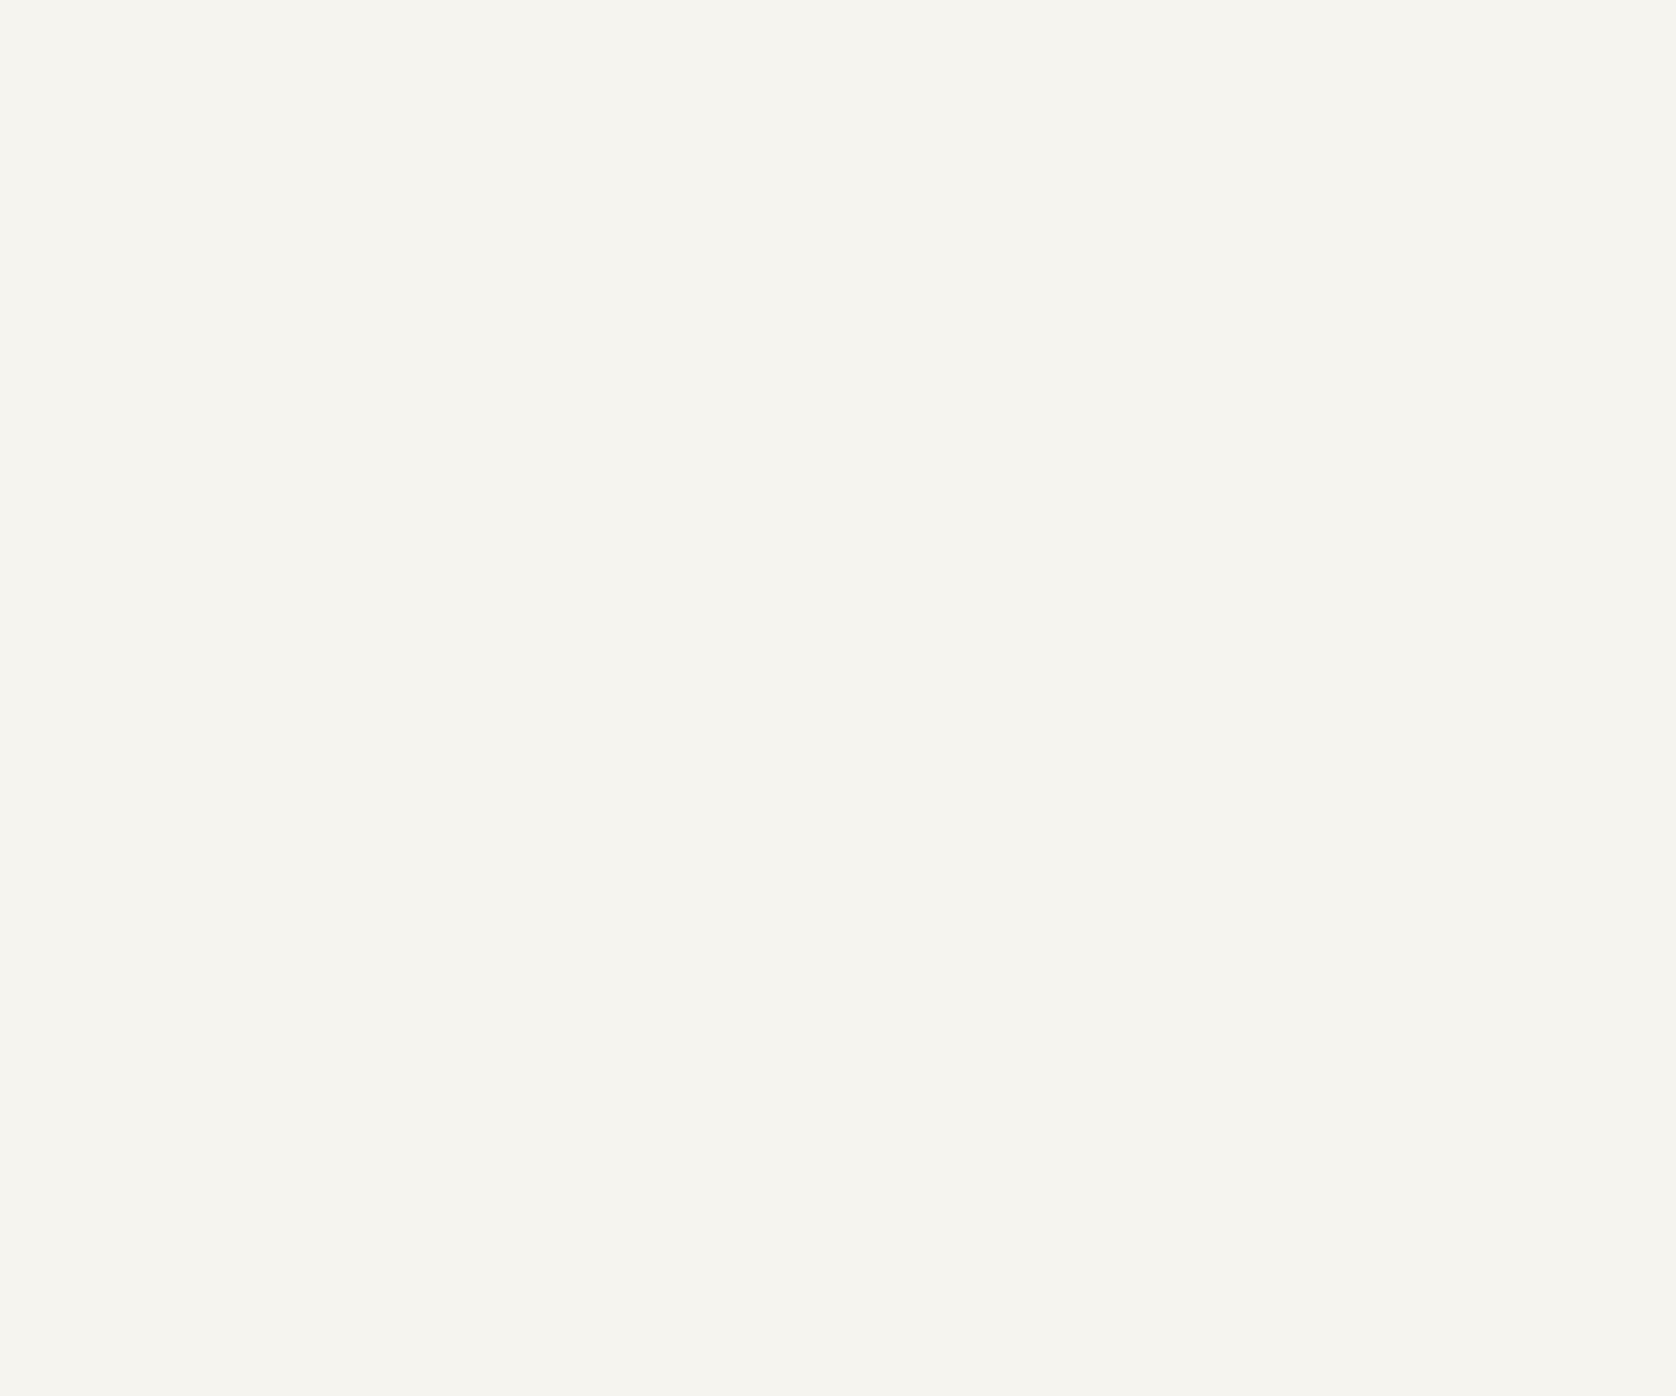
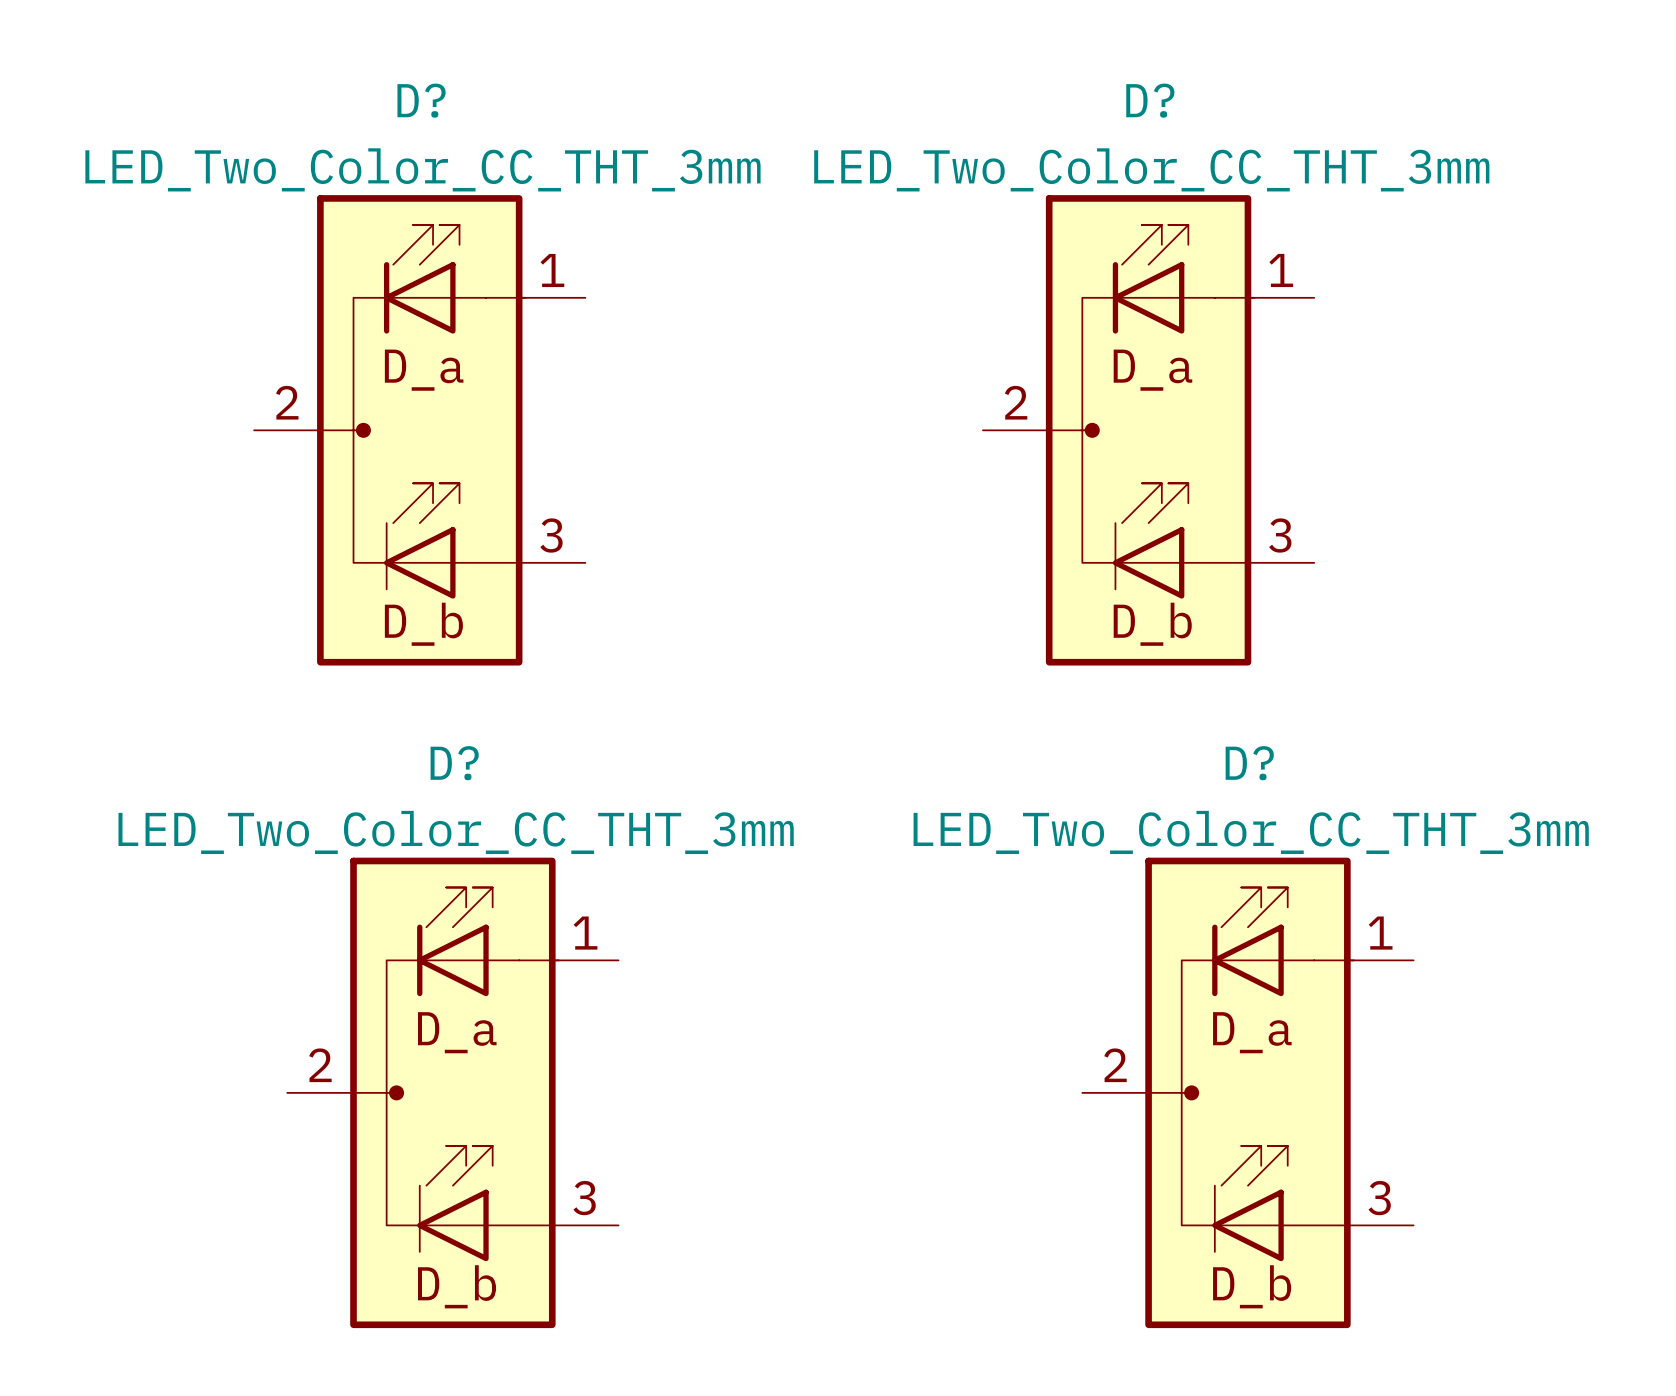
D?: none -> LED_Two_Color_CC_THT_3mm (419, 430)
D?: none -> LED_Two_Color_CC_THT_3mm (1148, 430)
D?: none -> LED_Two_Color_CC_THT_3mm (452, 1092)
D?: none -> LED_Two_Color_CC_THT_3mm (1247, 1092)

